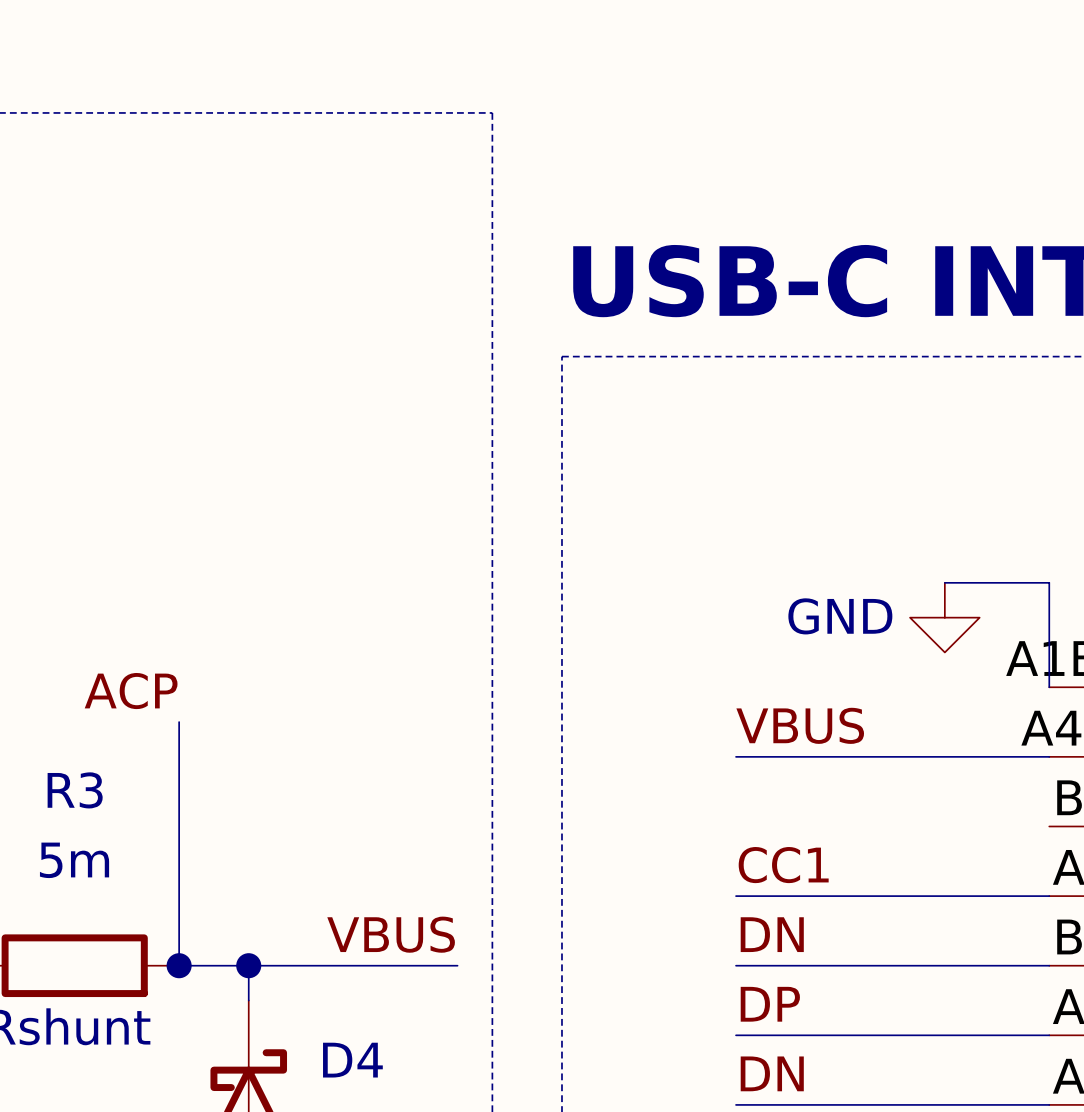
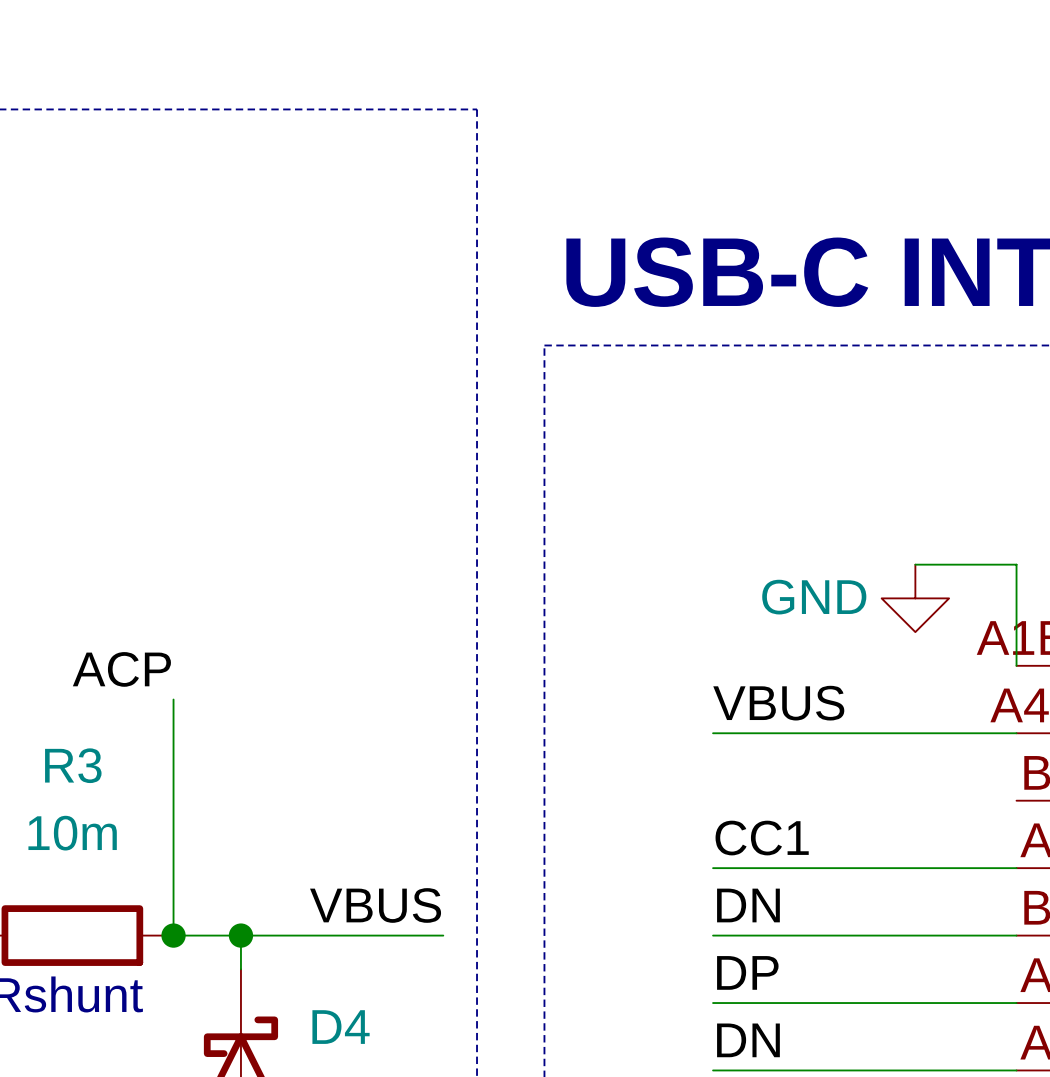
R3 value: 5m (74, 860) -> 10m (72, 833)

